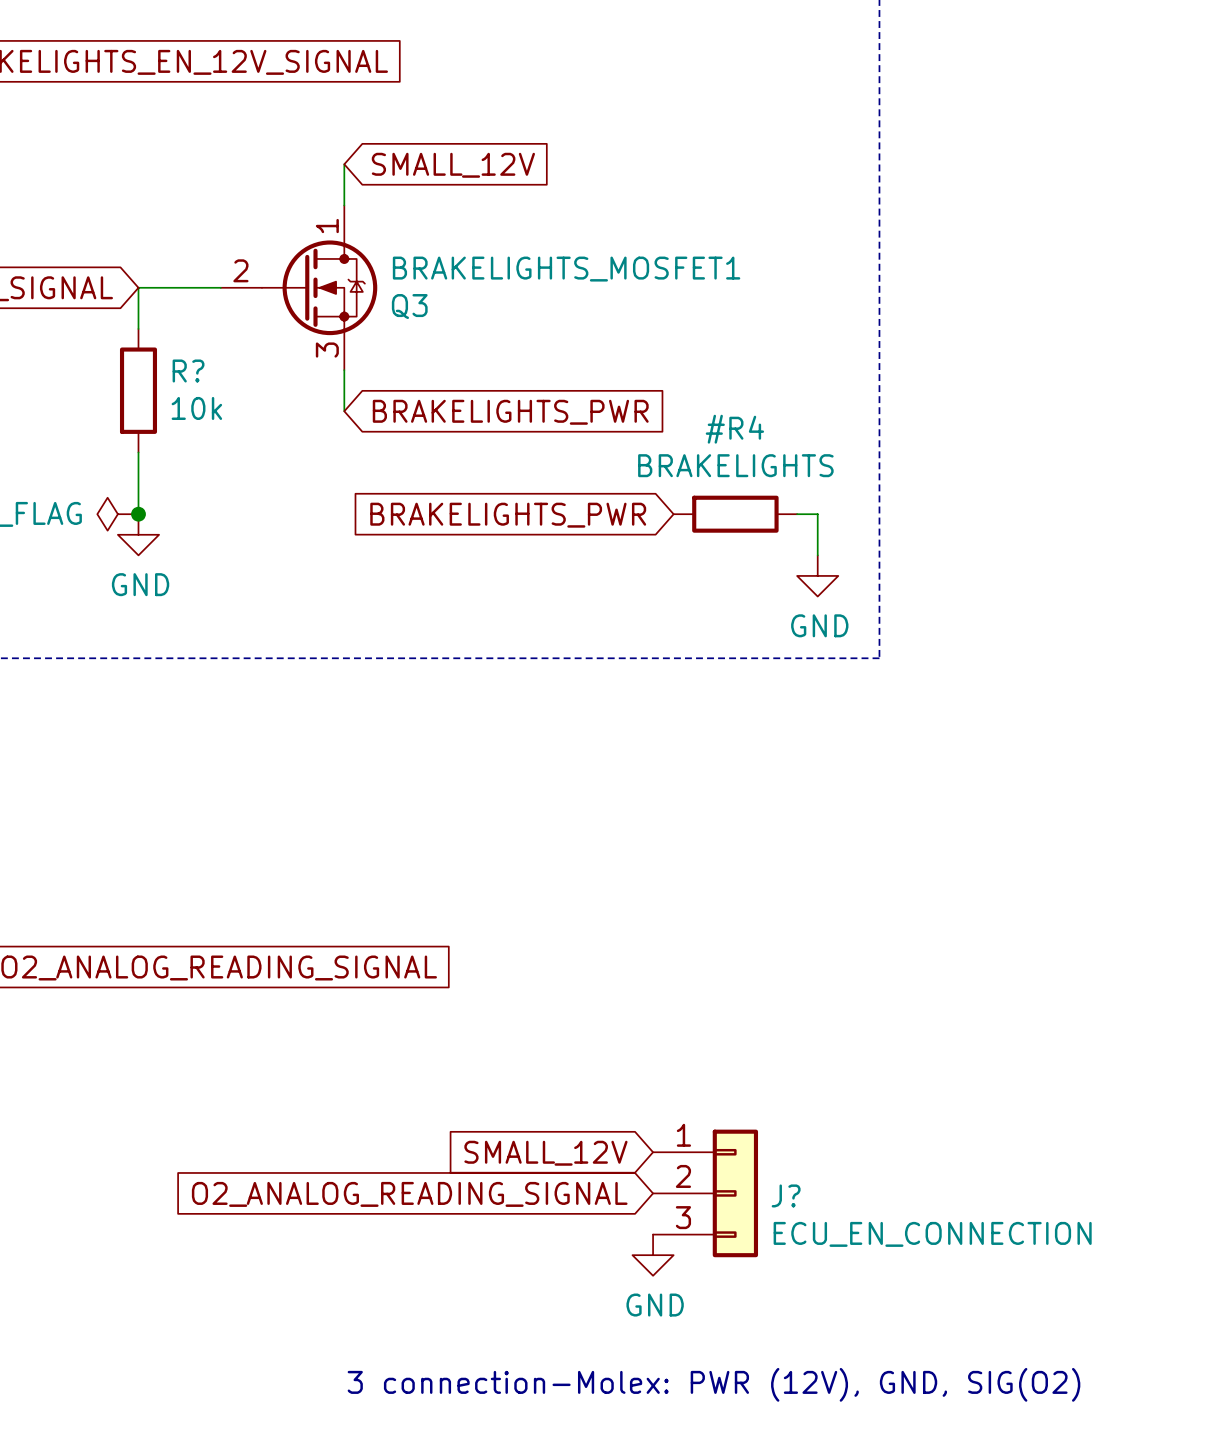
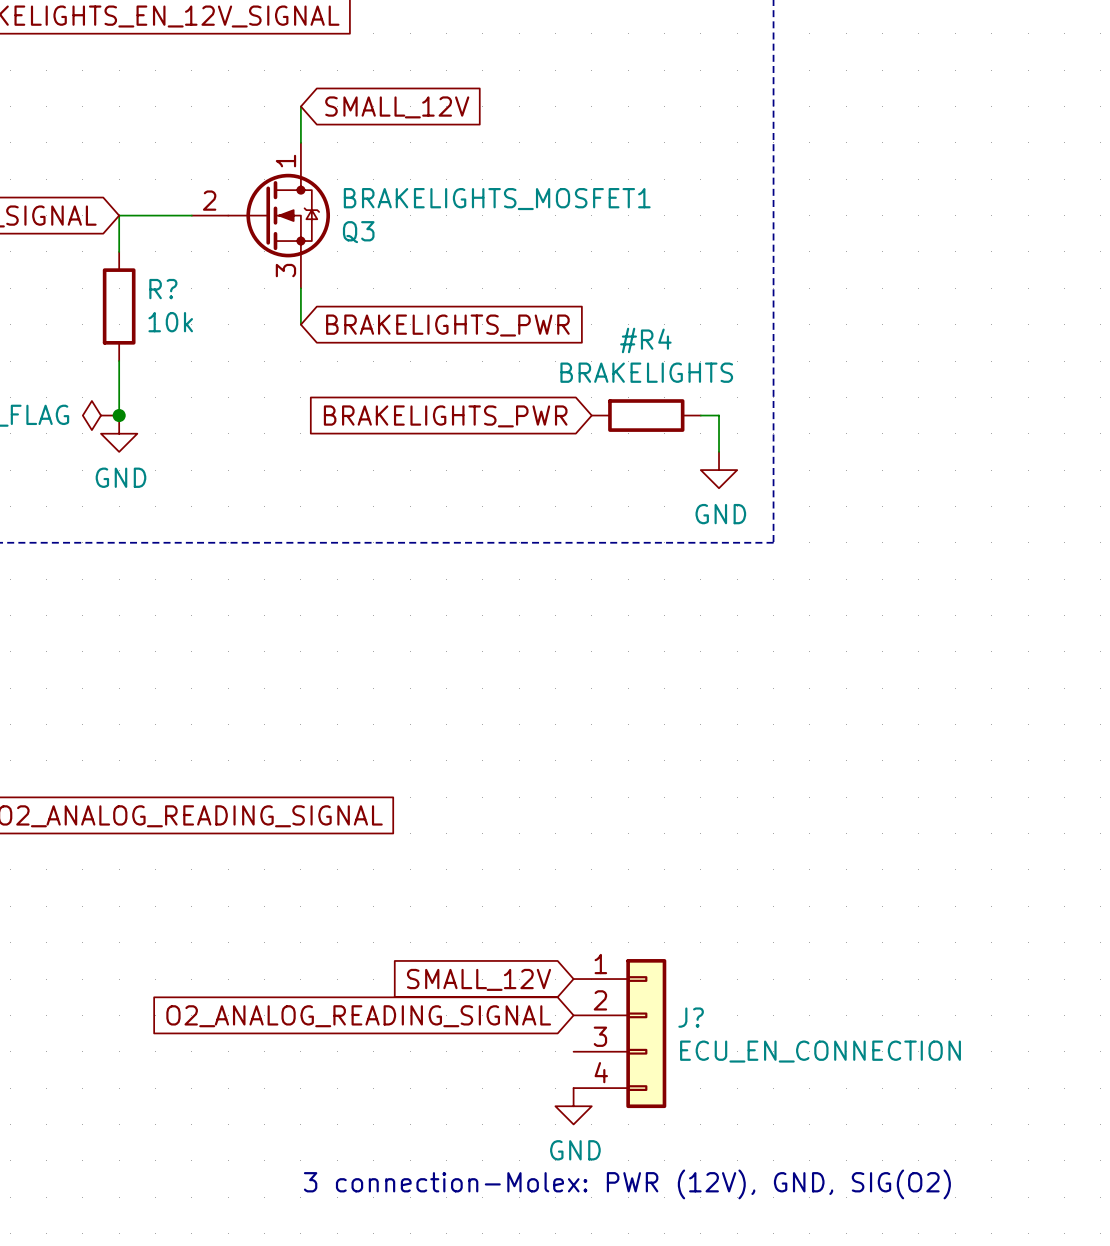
J?: ECU_EN_CONNECTION (705, 1193) -> none
J?: none -> ECU_EN_CONNECTION (619, 1033)
power symbol position: GND (653, 1255) -> GND (573, 1106)

